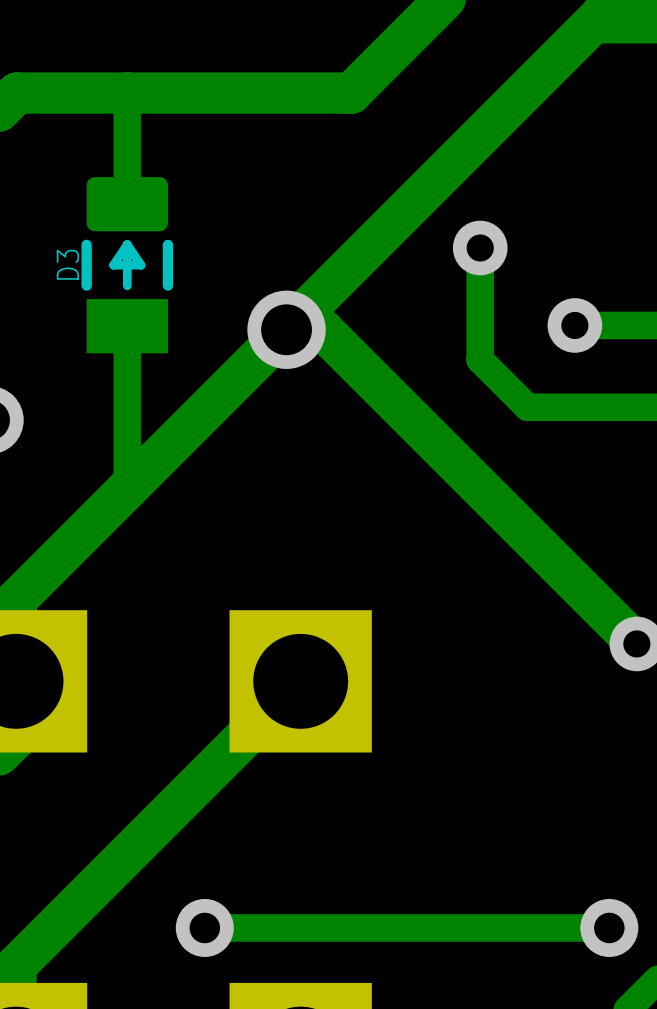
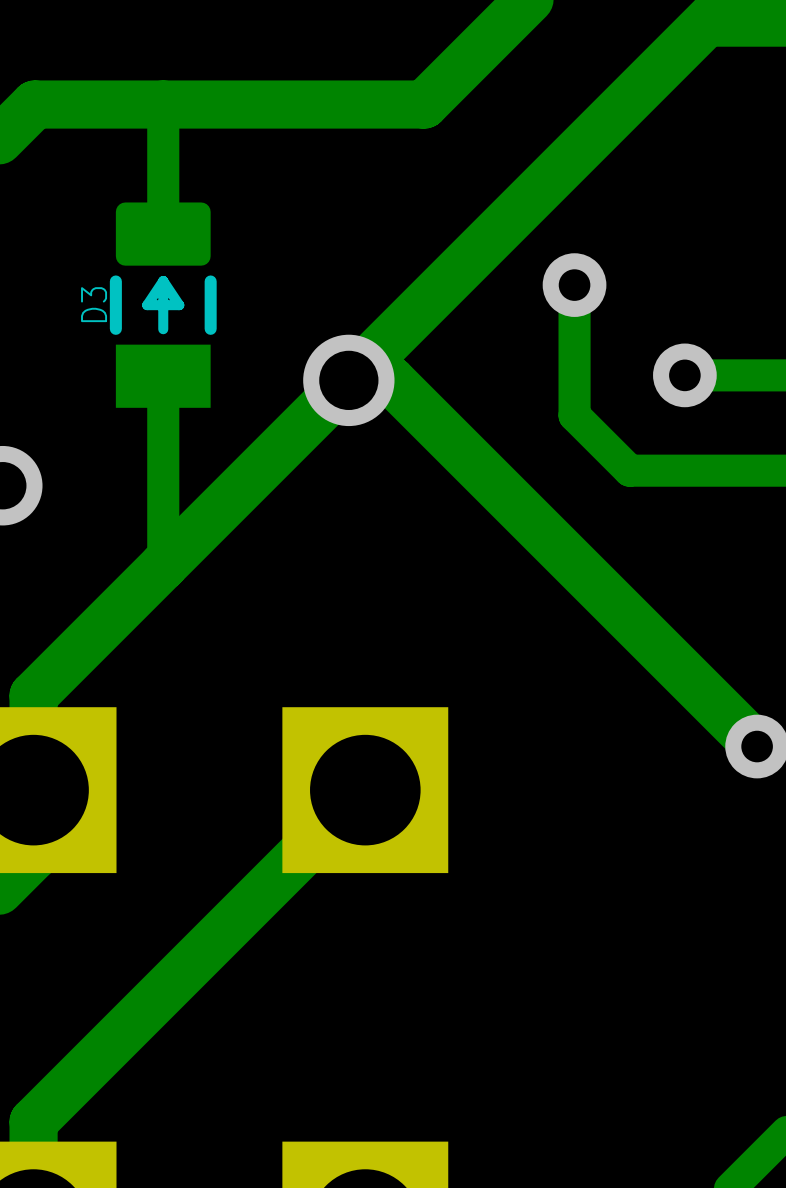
via: (204, 927) -> none
track: (609, 927) (204, 927) -> none
via: (609, 927) -> none

